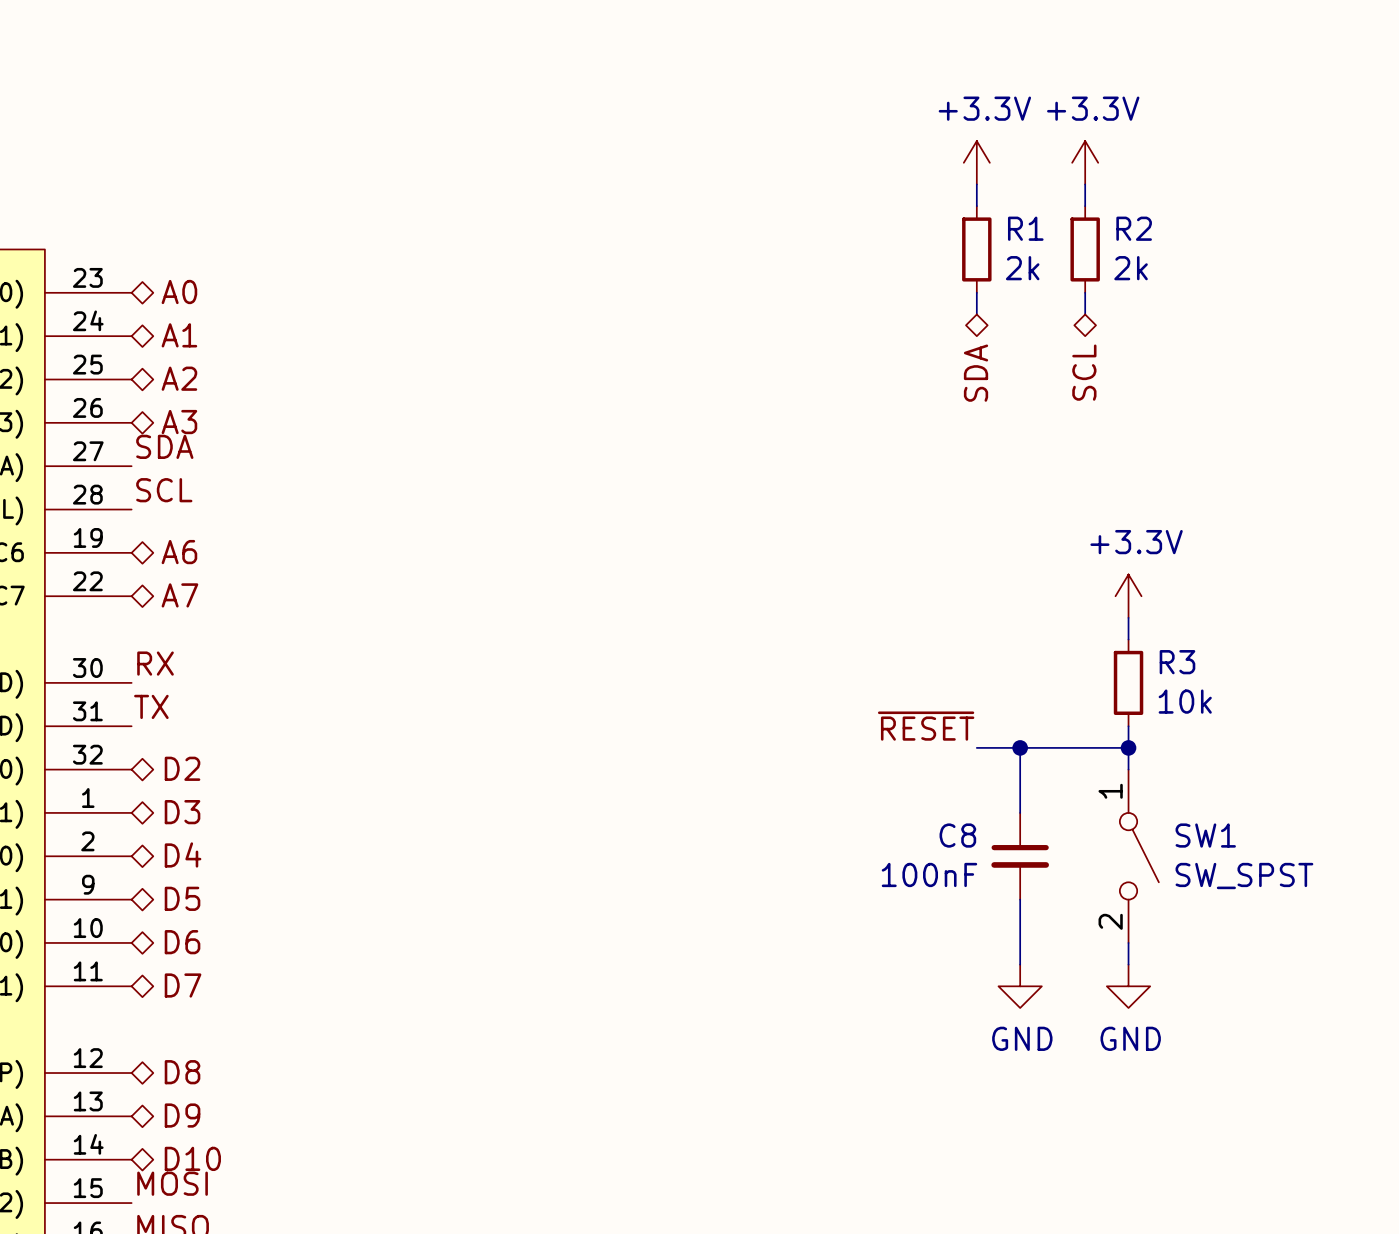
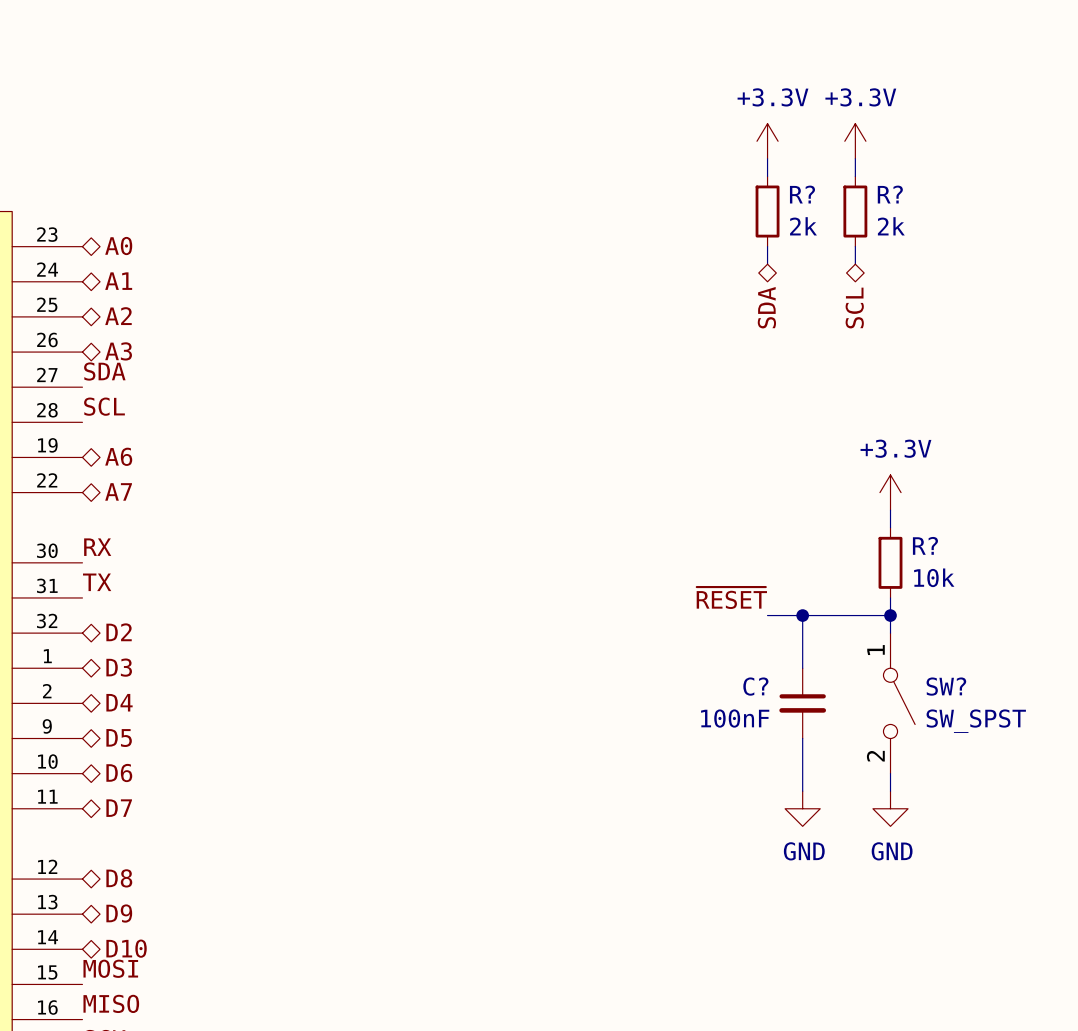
R1 name: R1 (1025, 228) -> R? (802, 194)
R2 name: R2 (1134, 228) -> R? (890, 194)
R3 name: R3 (1177, 662) -> R? (925, 545)
C8 name: C8 (957, 835) -> C? (755, 686)
SW1 name: SW1 (1205, 835) -> SW? (946, 686)

